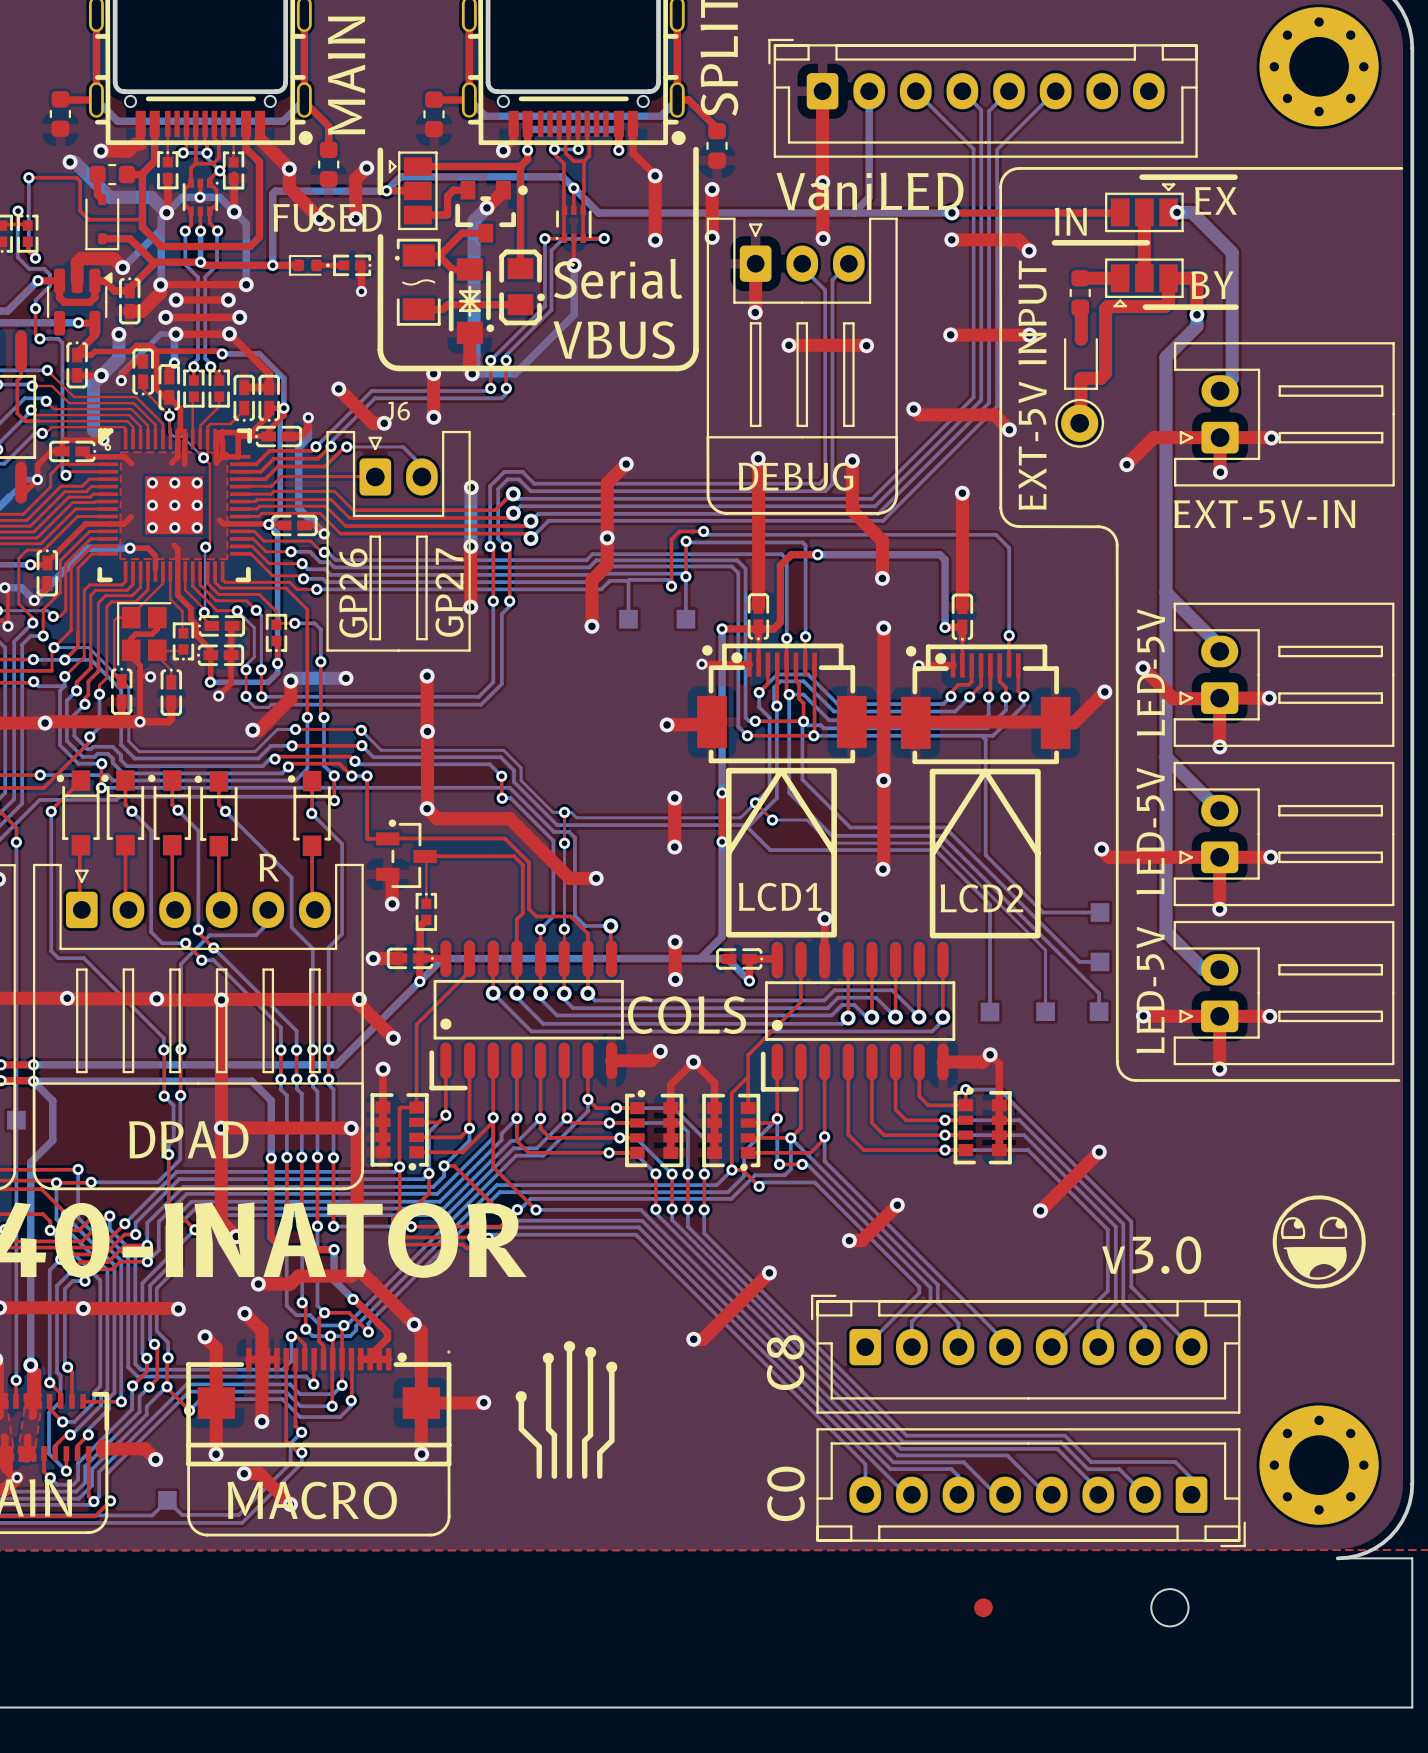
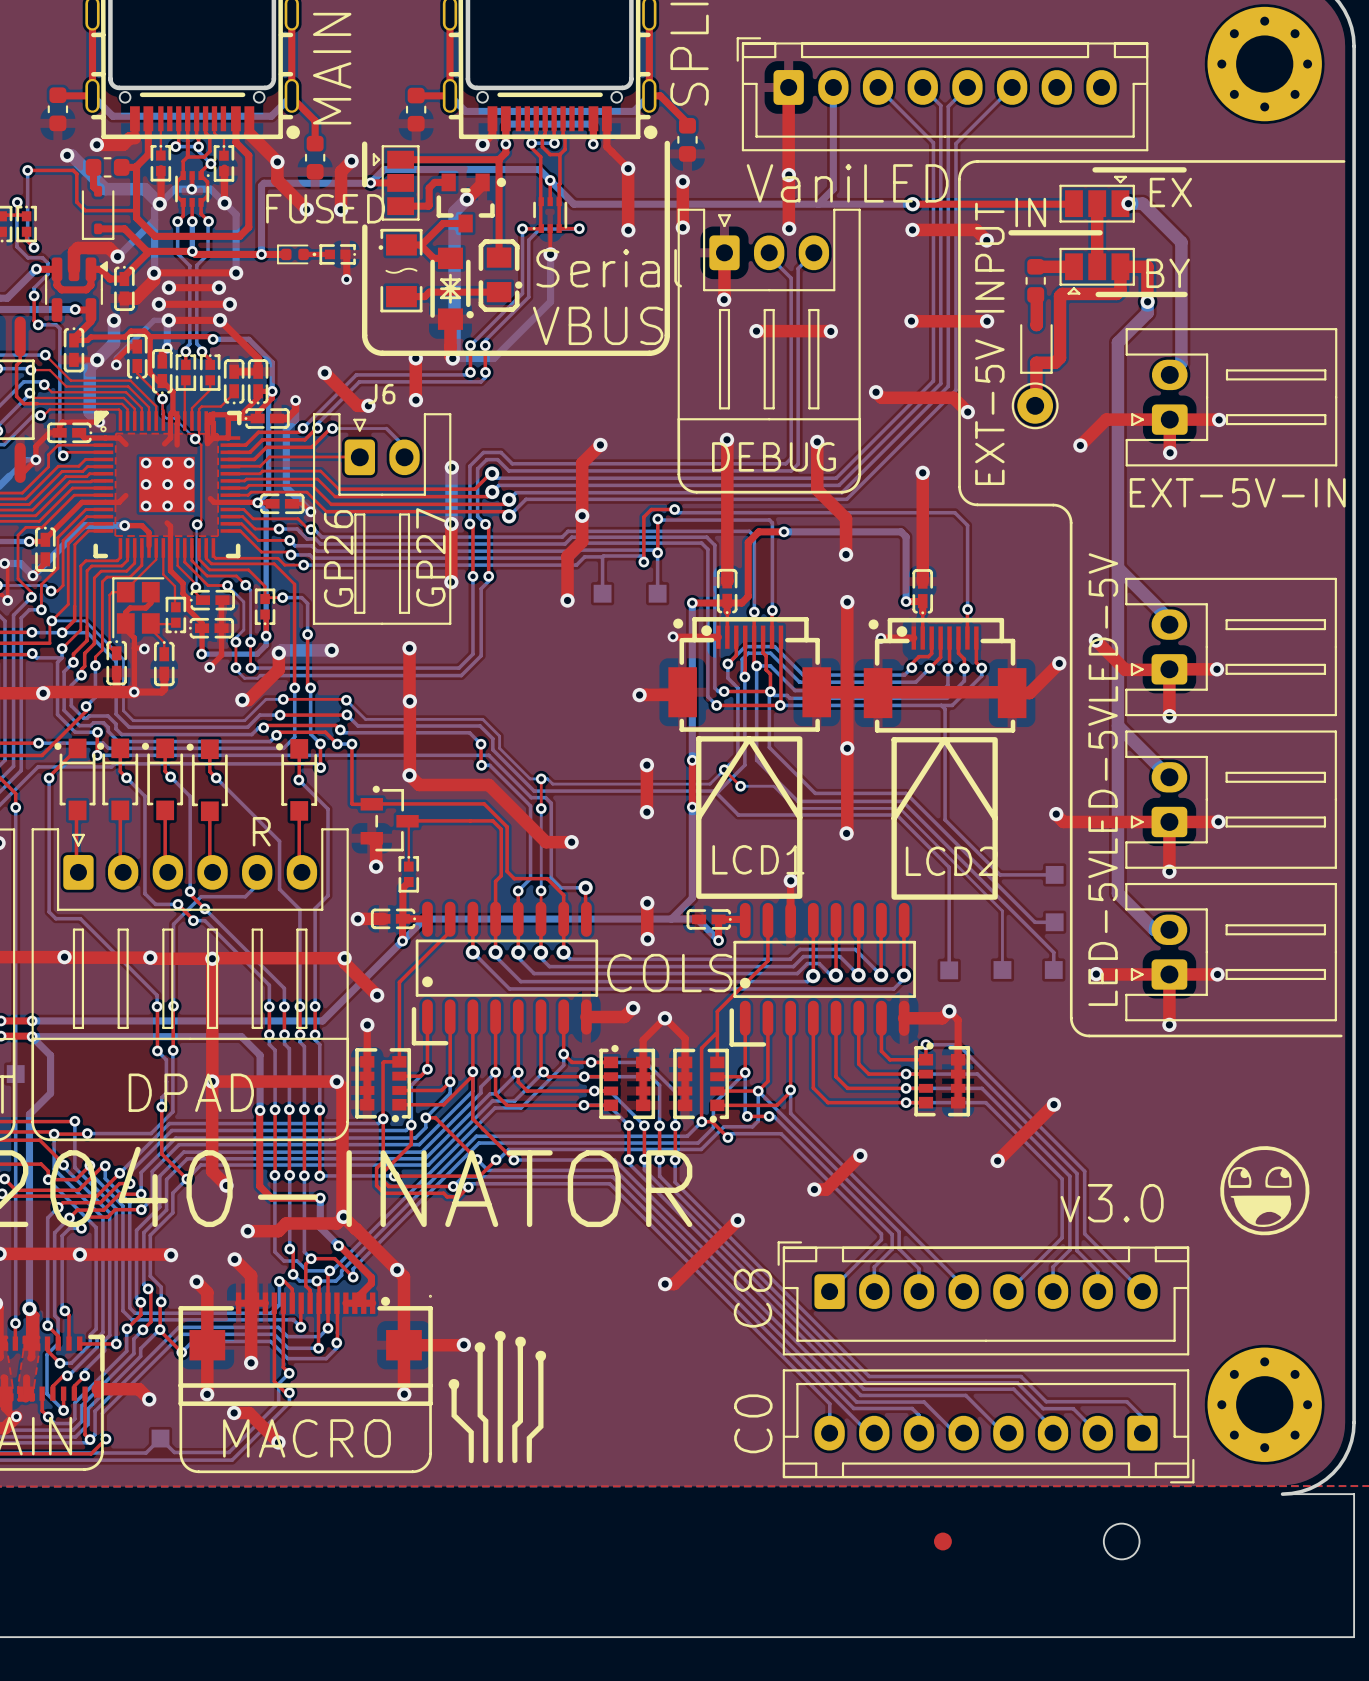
drawing position: (566, 1409) -> (497, 1397)

